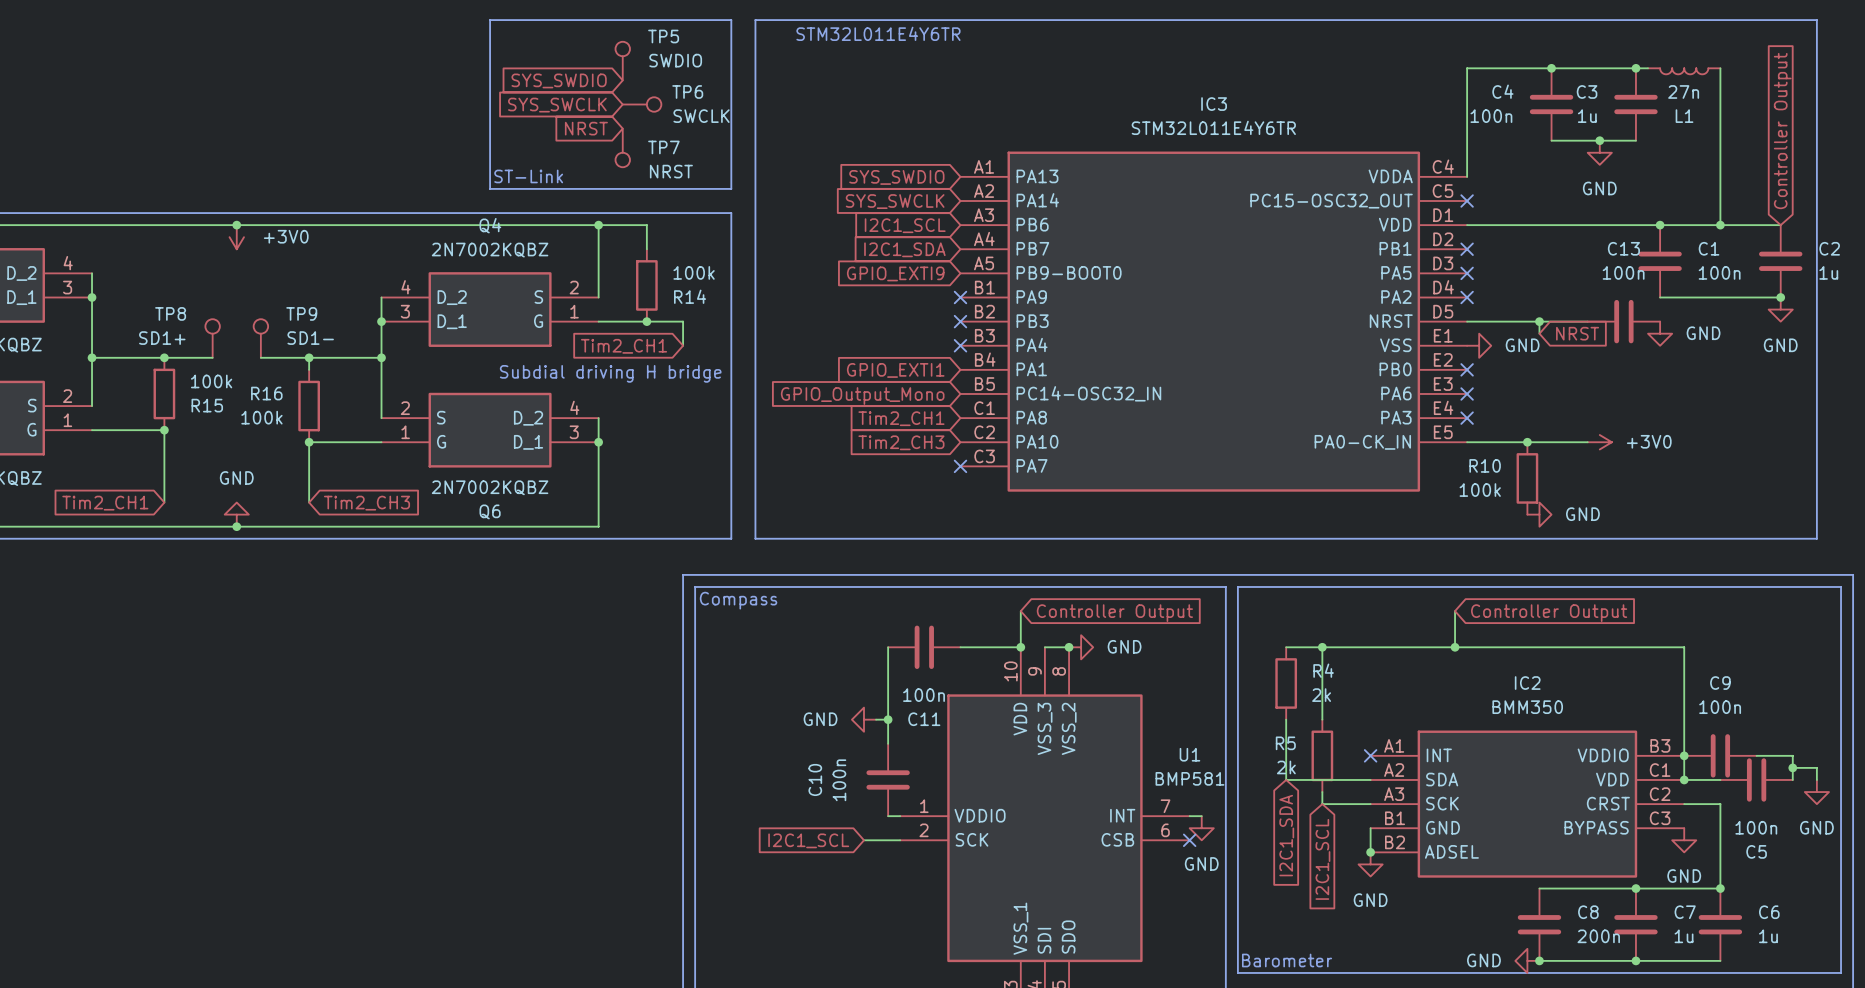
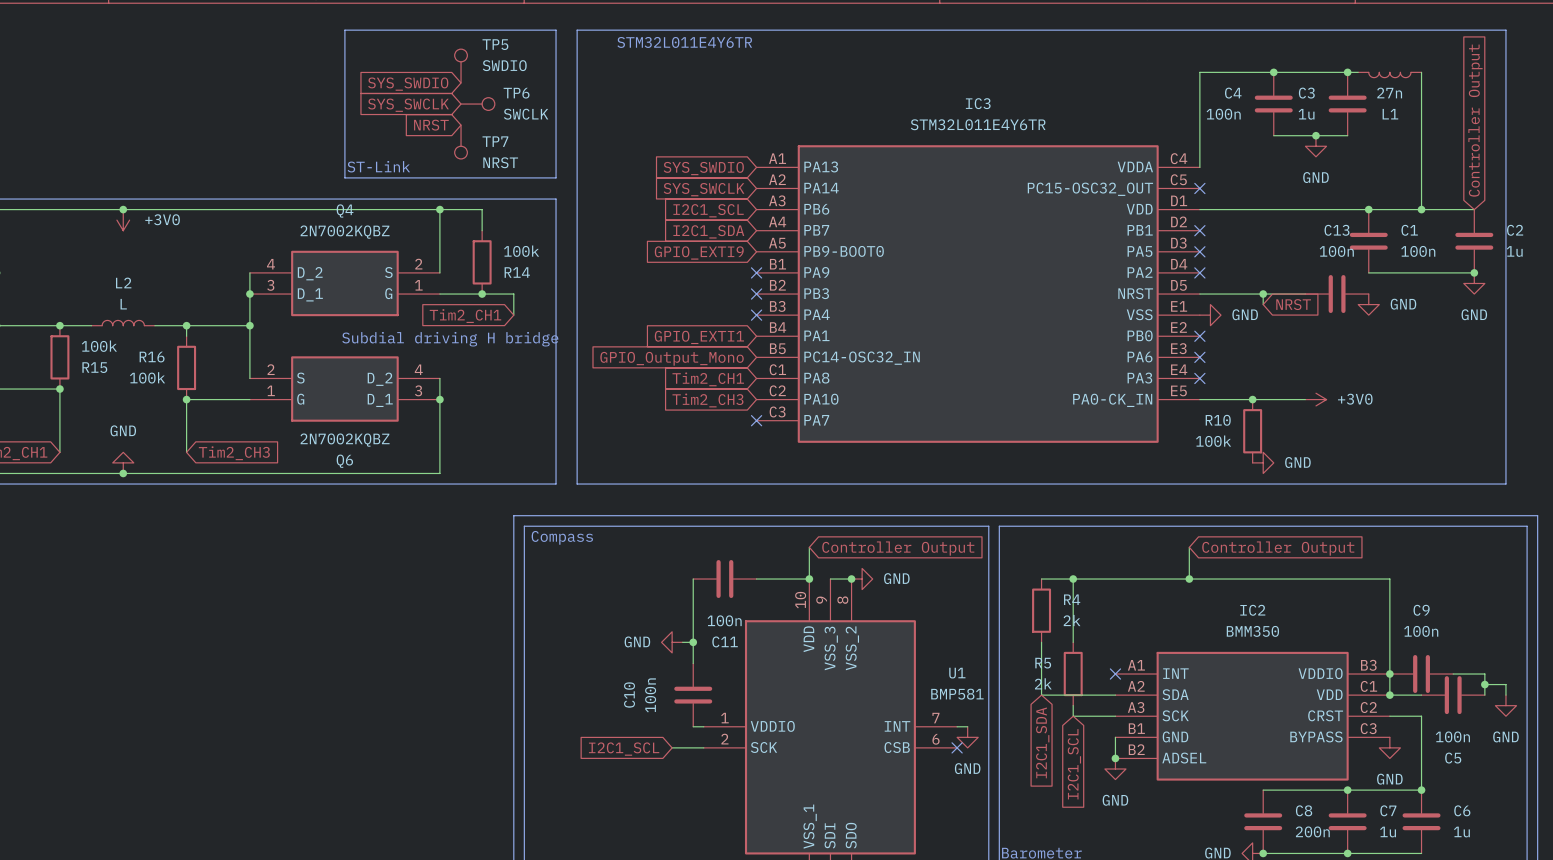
TP8: SD1+ (212, 338) -> none
TP9: SD1- (260, 338) -> none
L2: none -> L (123, 323)

